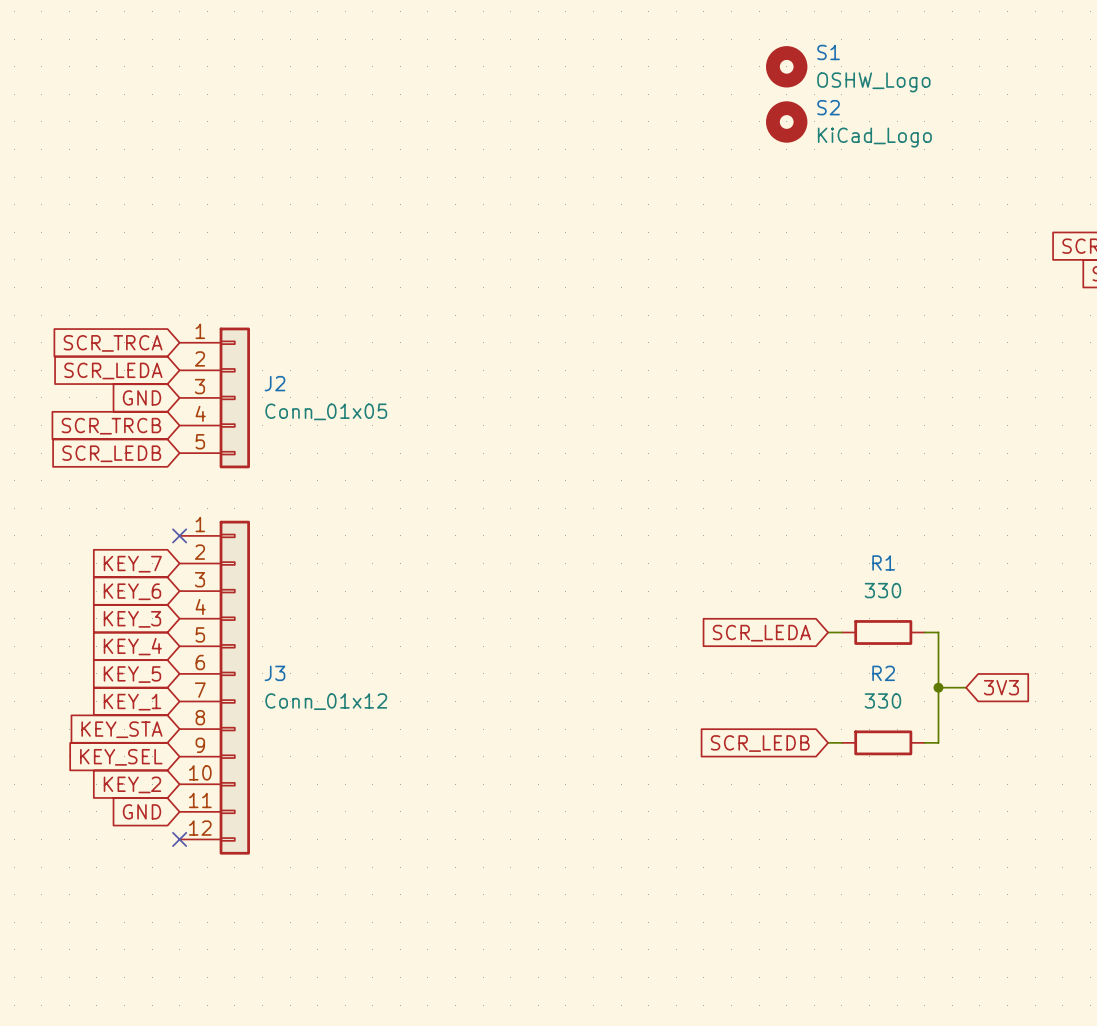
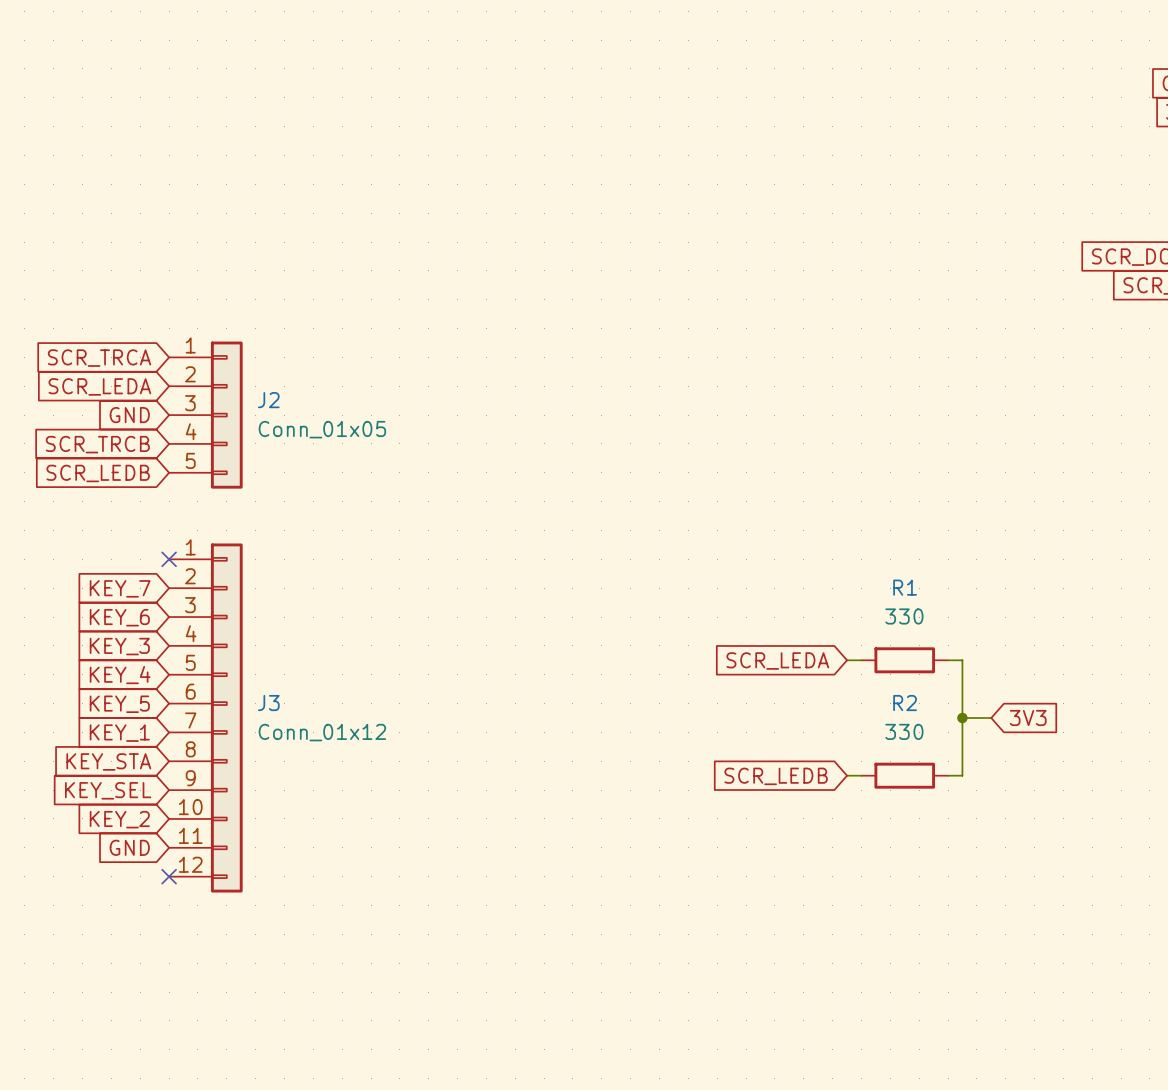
S1: OSHW_Logo (786, 66) -> none
S2: KiCad_Logo (786, 121) -> none

